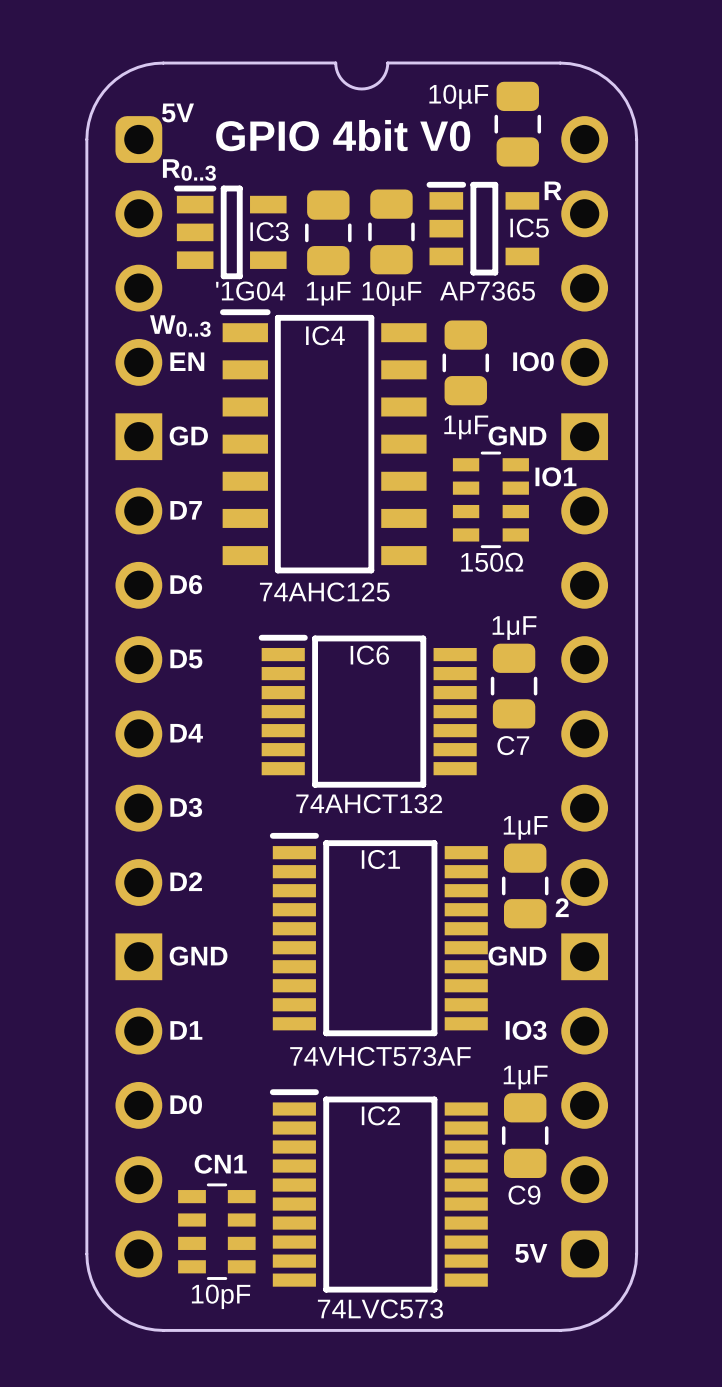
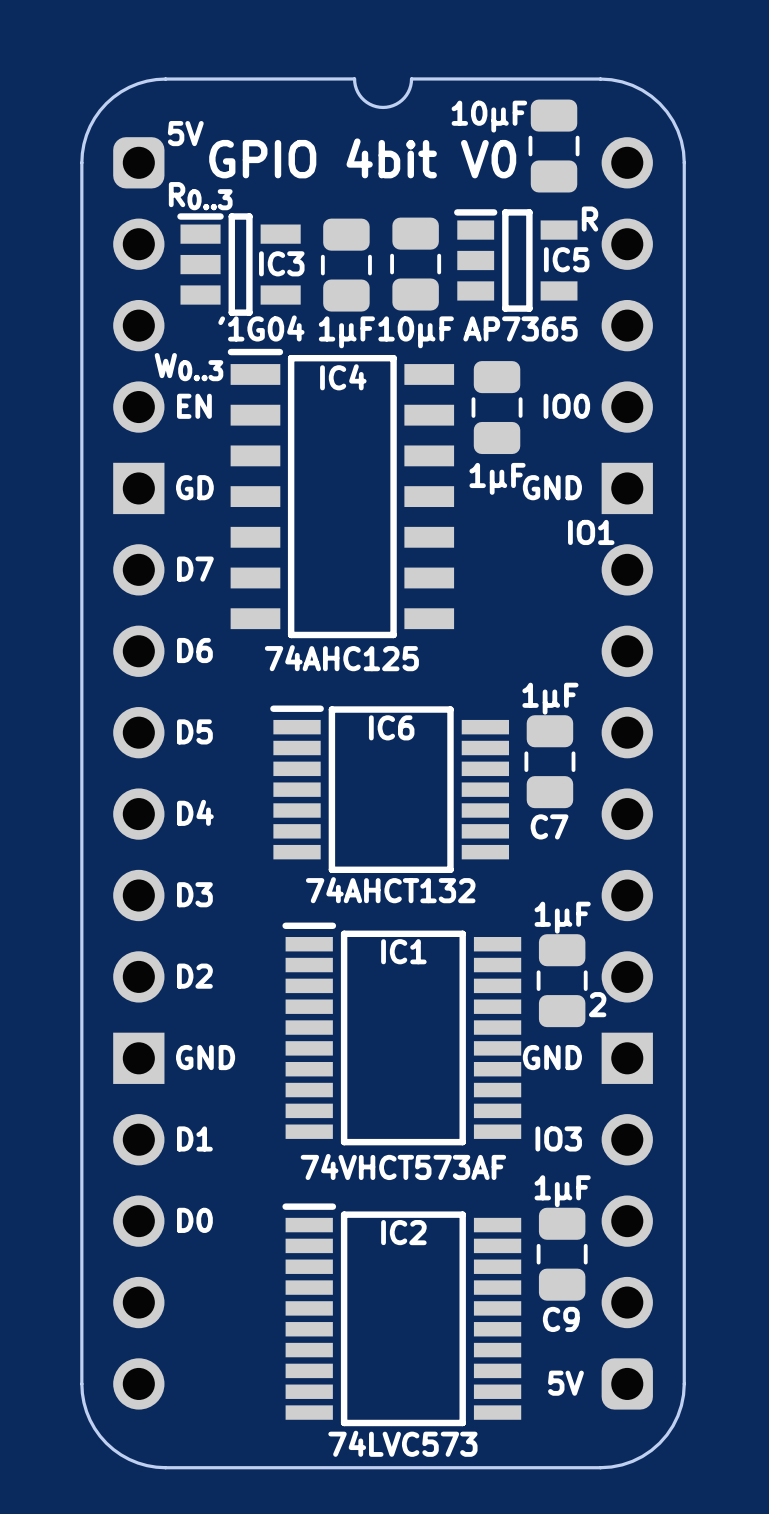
part: (490, 499) -> none
CN1: (216, 1231) -> none

